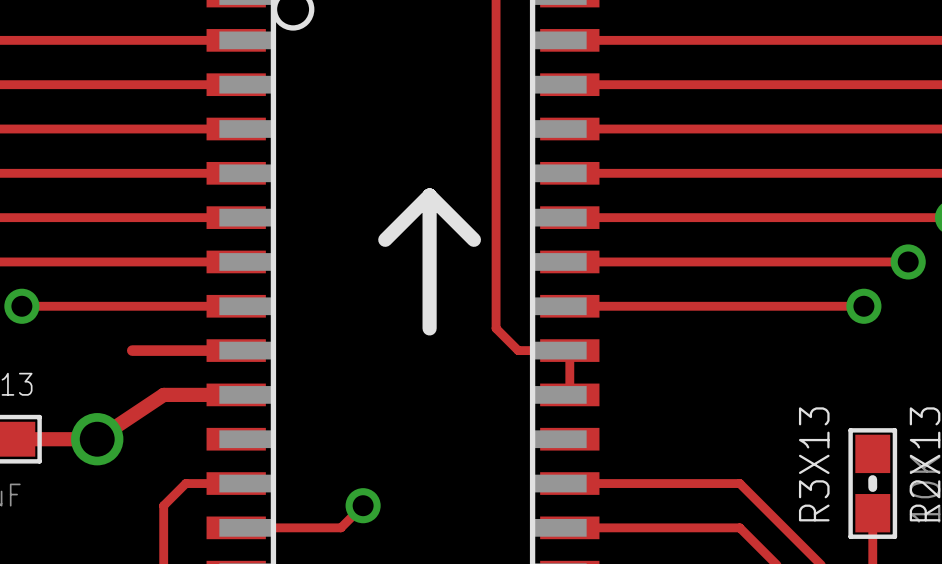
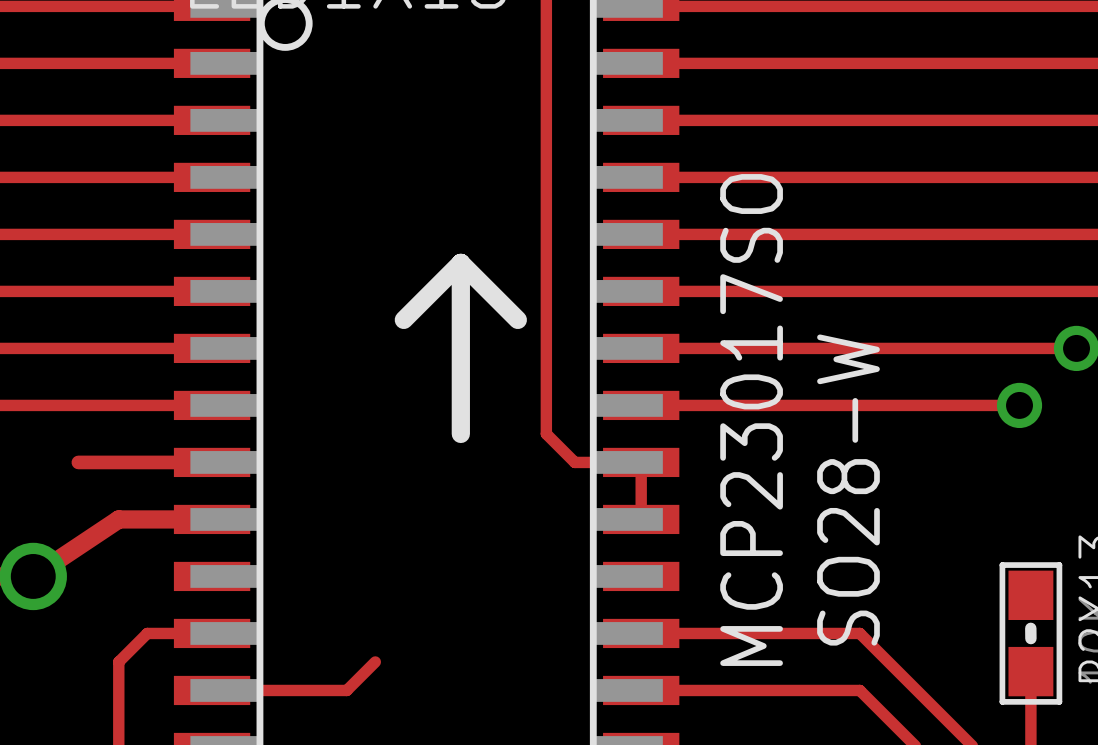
text: none -> MCP23017SO (751, 420)
text: none -> SO28-W (848, 490)
R3X13 name: R3X13 (814, 464) -> none
via: (363, 505) -> none

